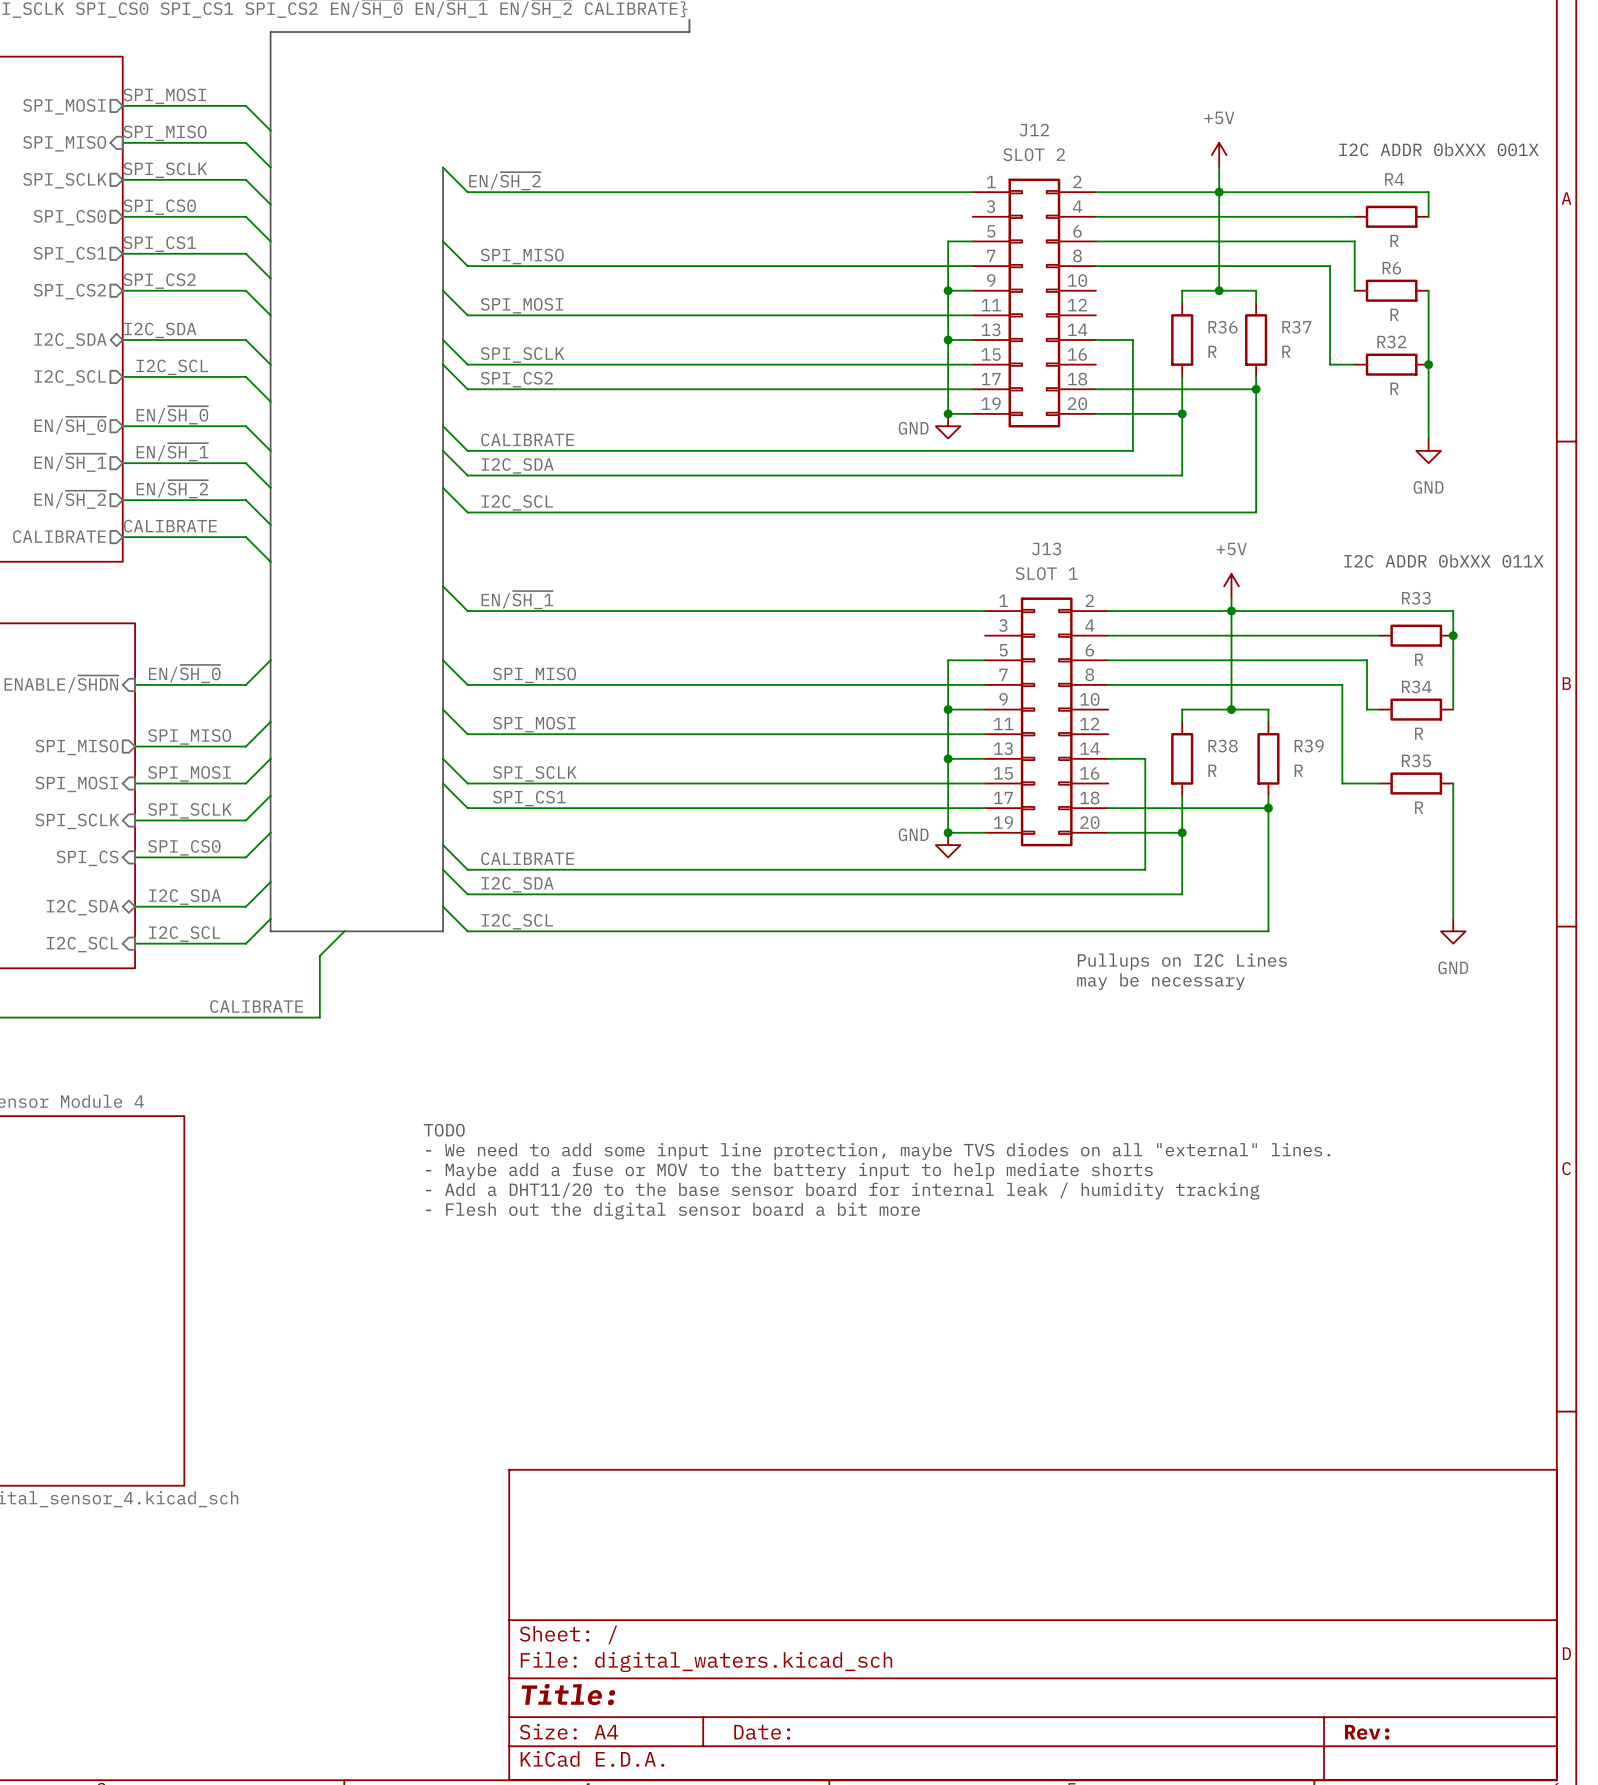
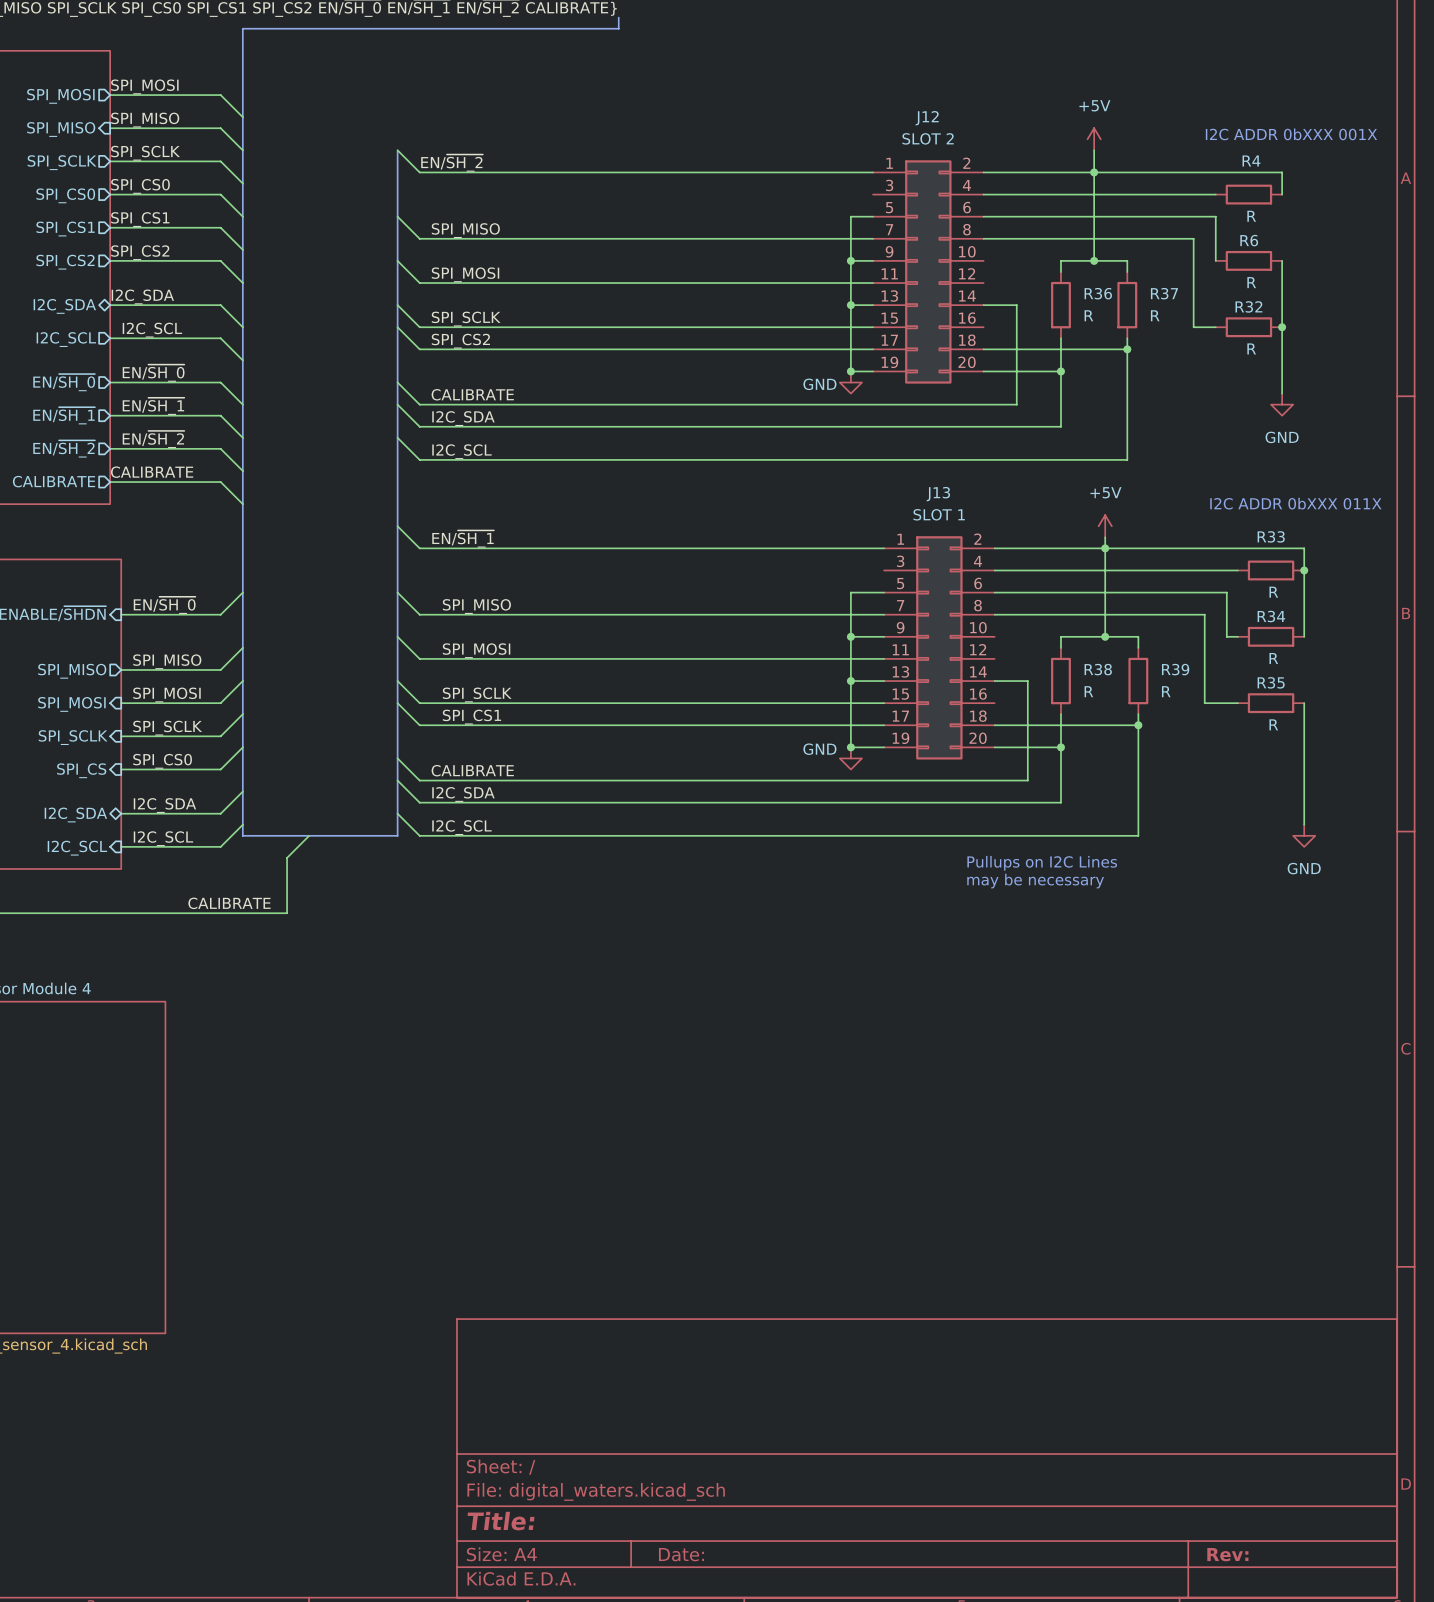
text: TODO (444, 1130) -> none
text: - We need to add some input line protection, maybe TVS diodes on all "external" lines. (878, 1151) -> none
text: - Maybe add a fuse or MOV to the battery input to help mediate shorts (789, 1171) -> none
text: - Add a DHT11/20 to the base sensor board for internal leak / humidity tracking (842, 1191) -> none
text: - Flesh out the digital sensor board a bit more (672, 1211) -> none

